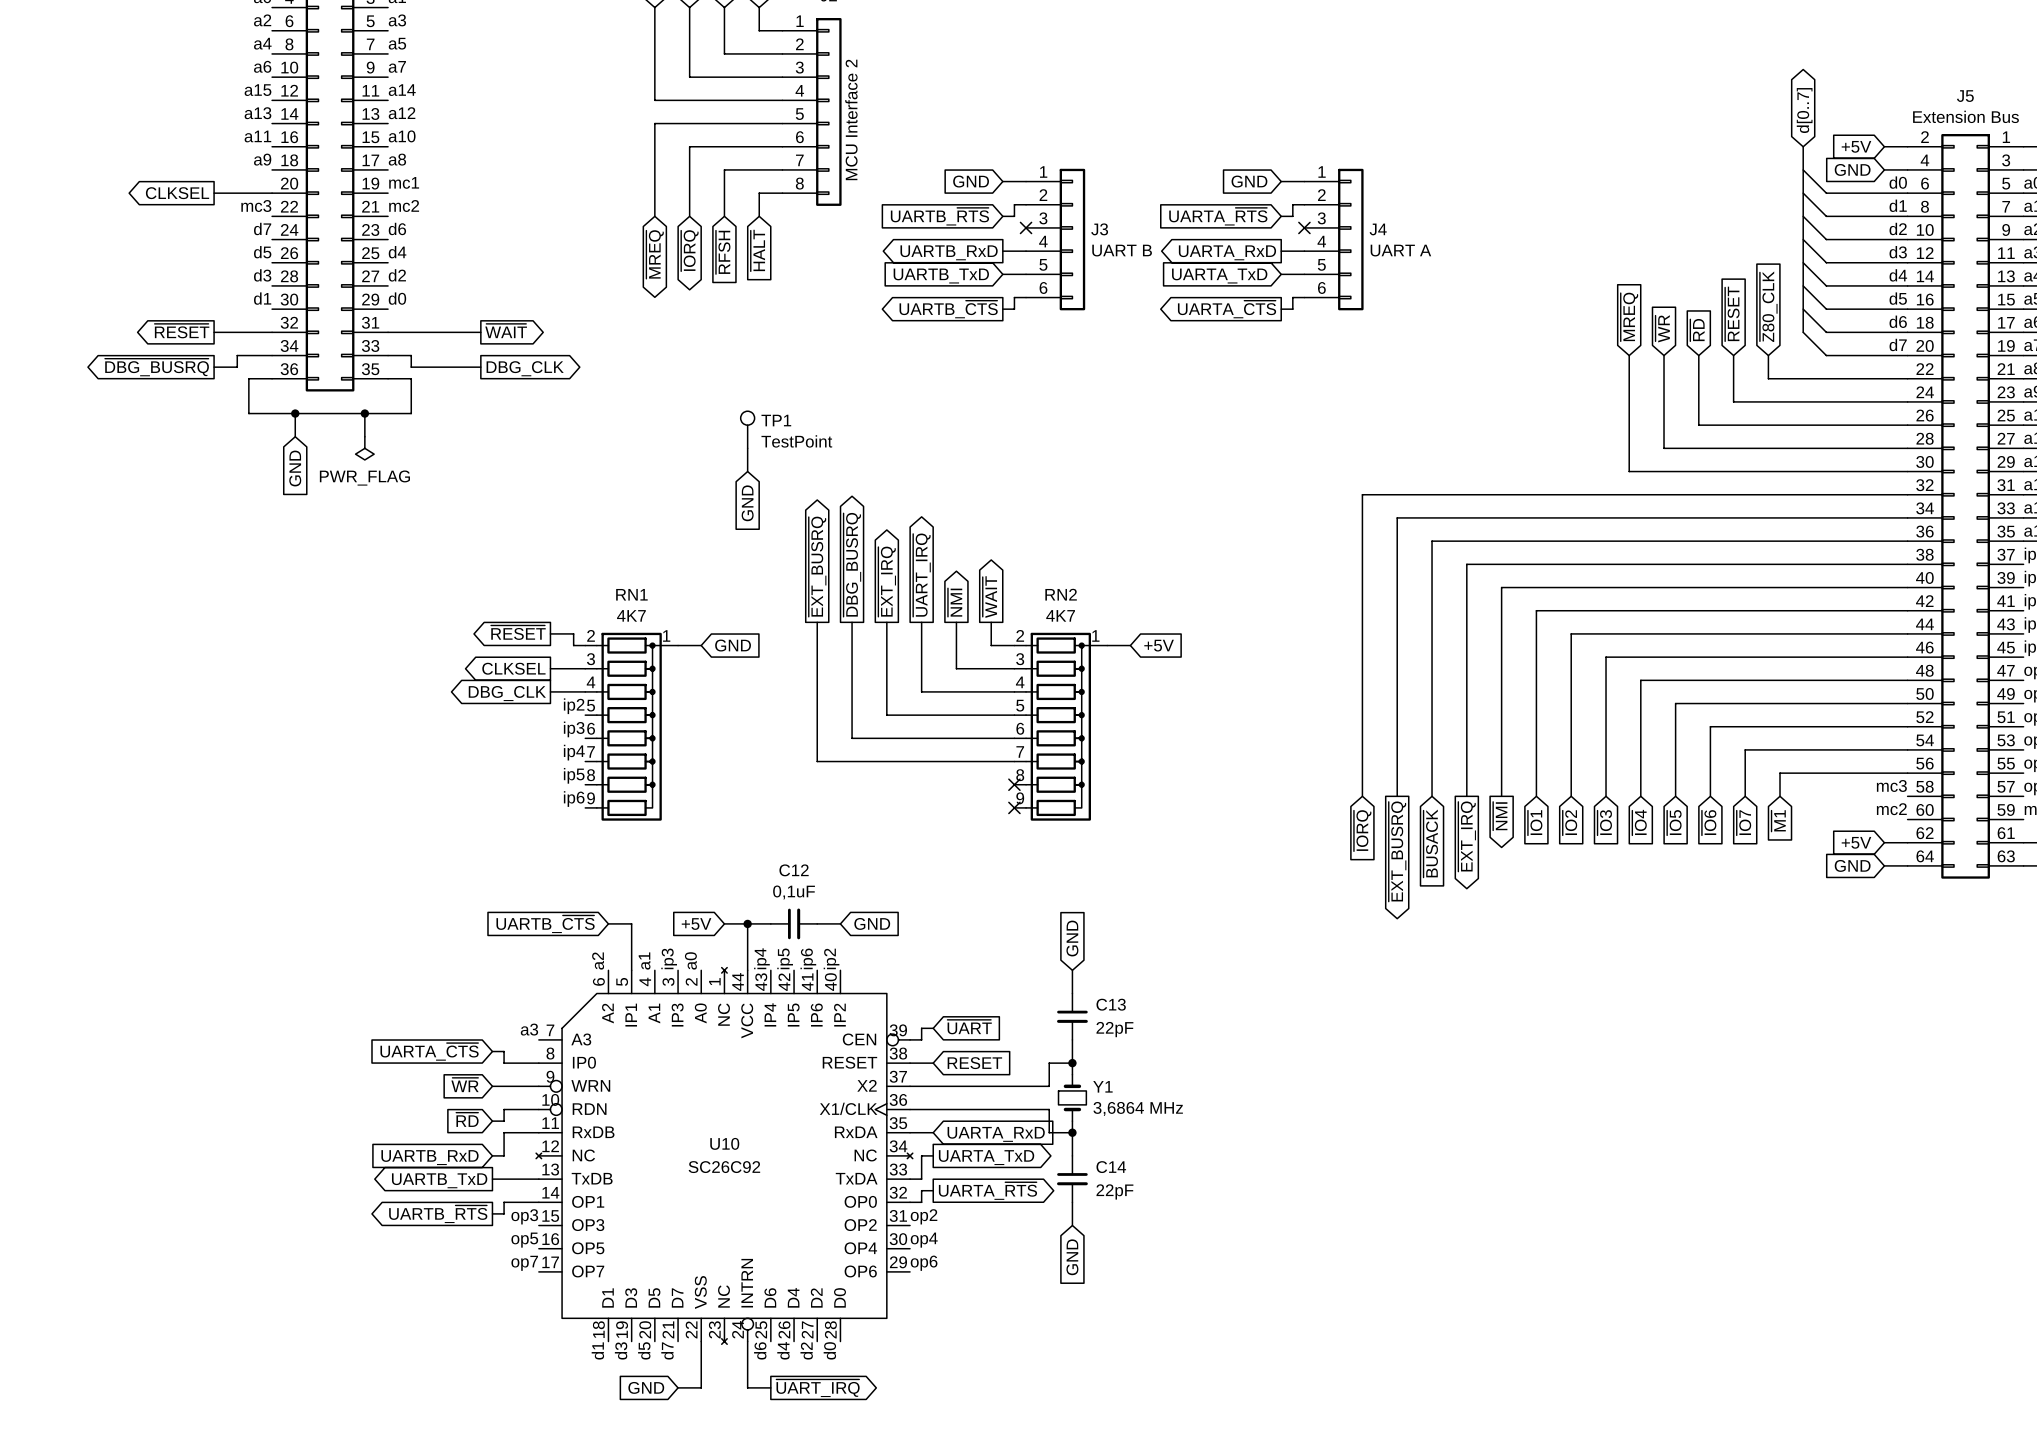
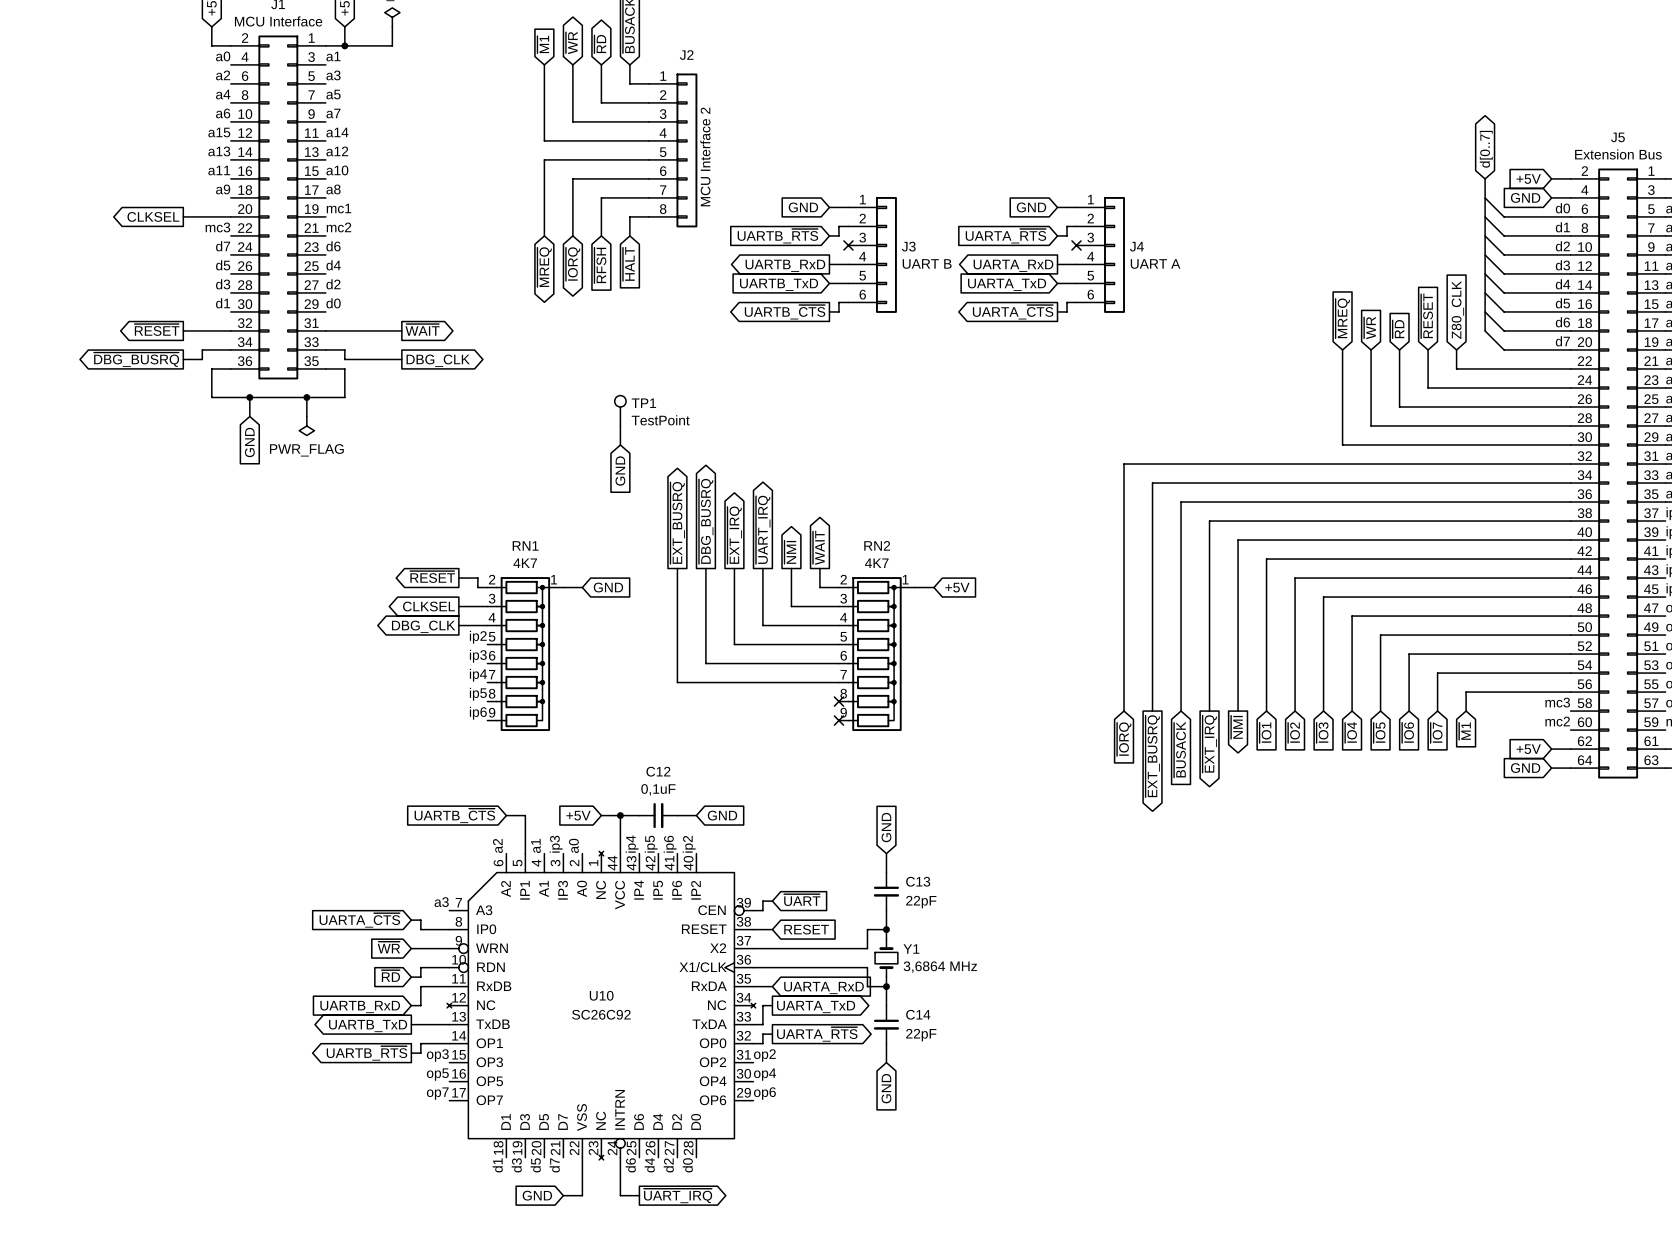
global label: ~{Z80_CLK} (1768, 306) -> Z80_CLK (1457, 309)

